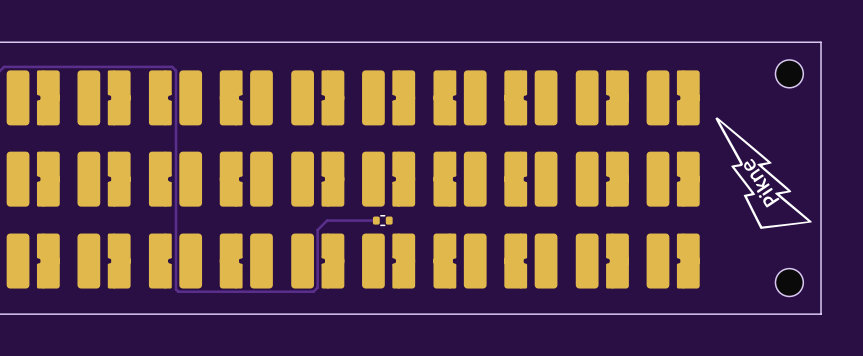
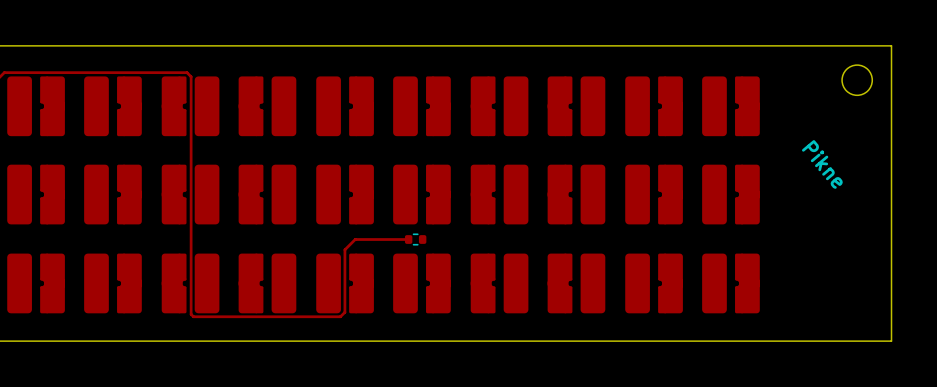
drawing: [715, 117, 812, 229] -> none
text: none -> Pikne (822, 164)
part: (789, 282) -> none

